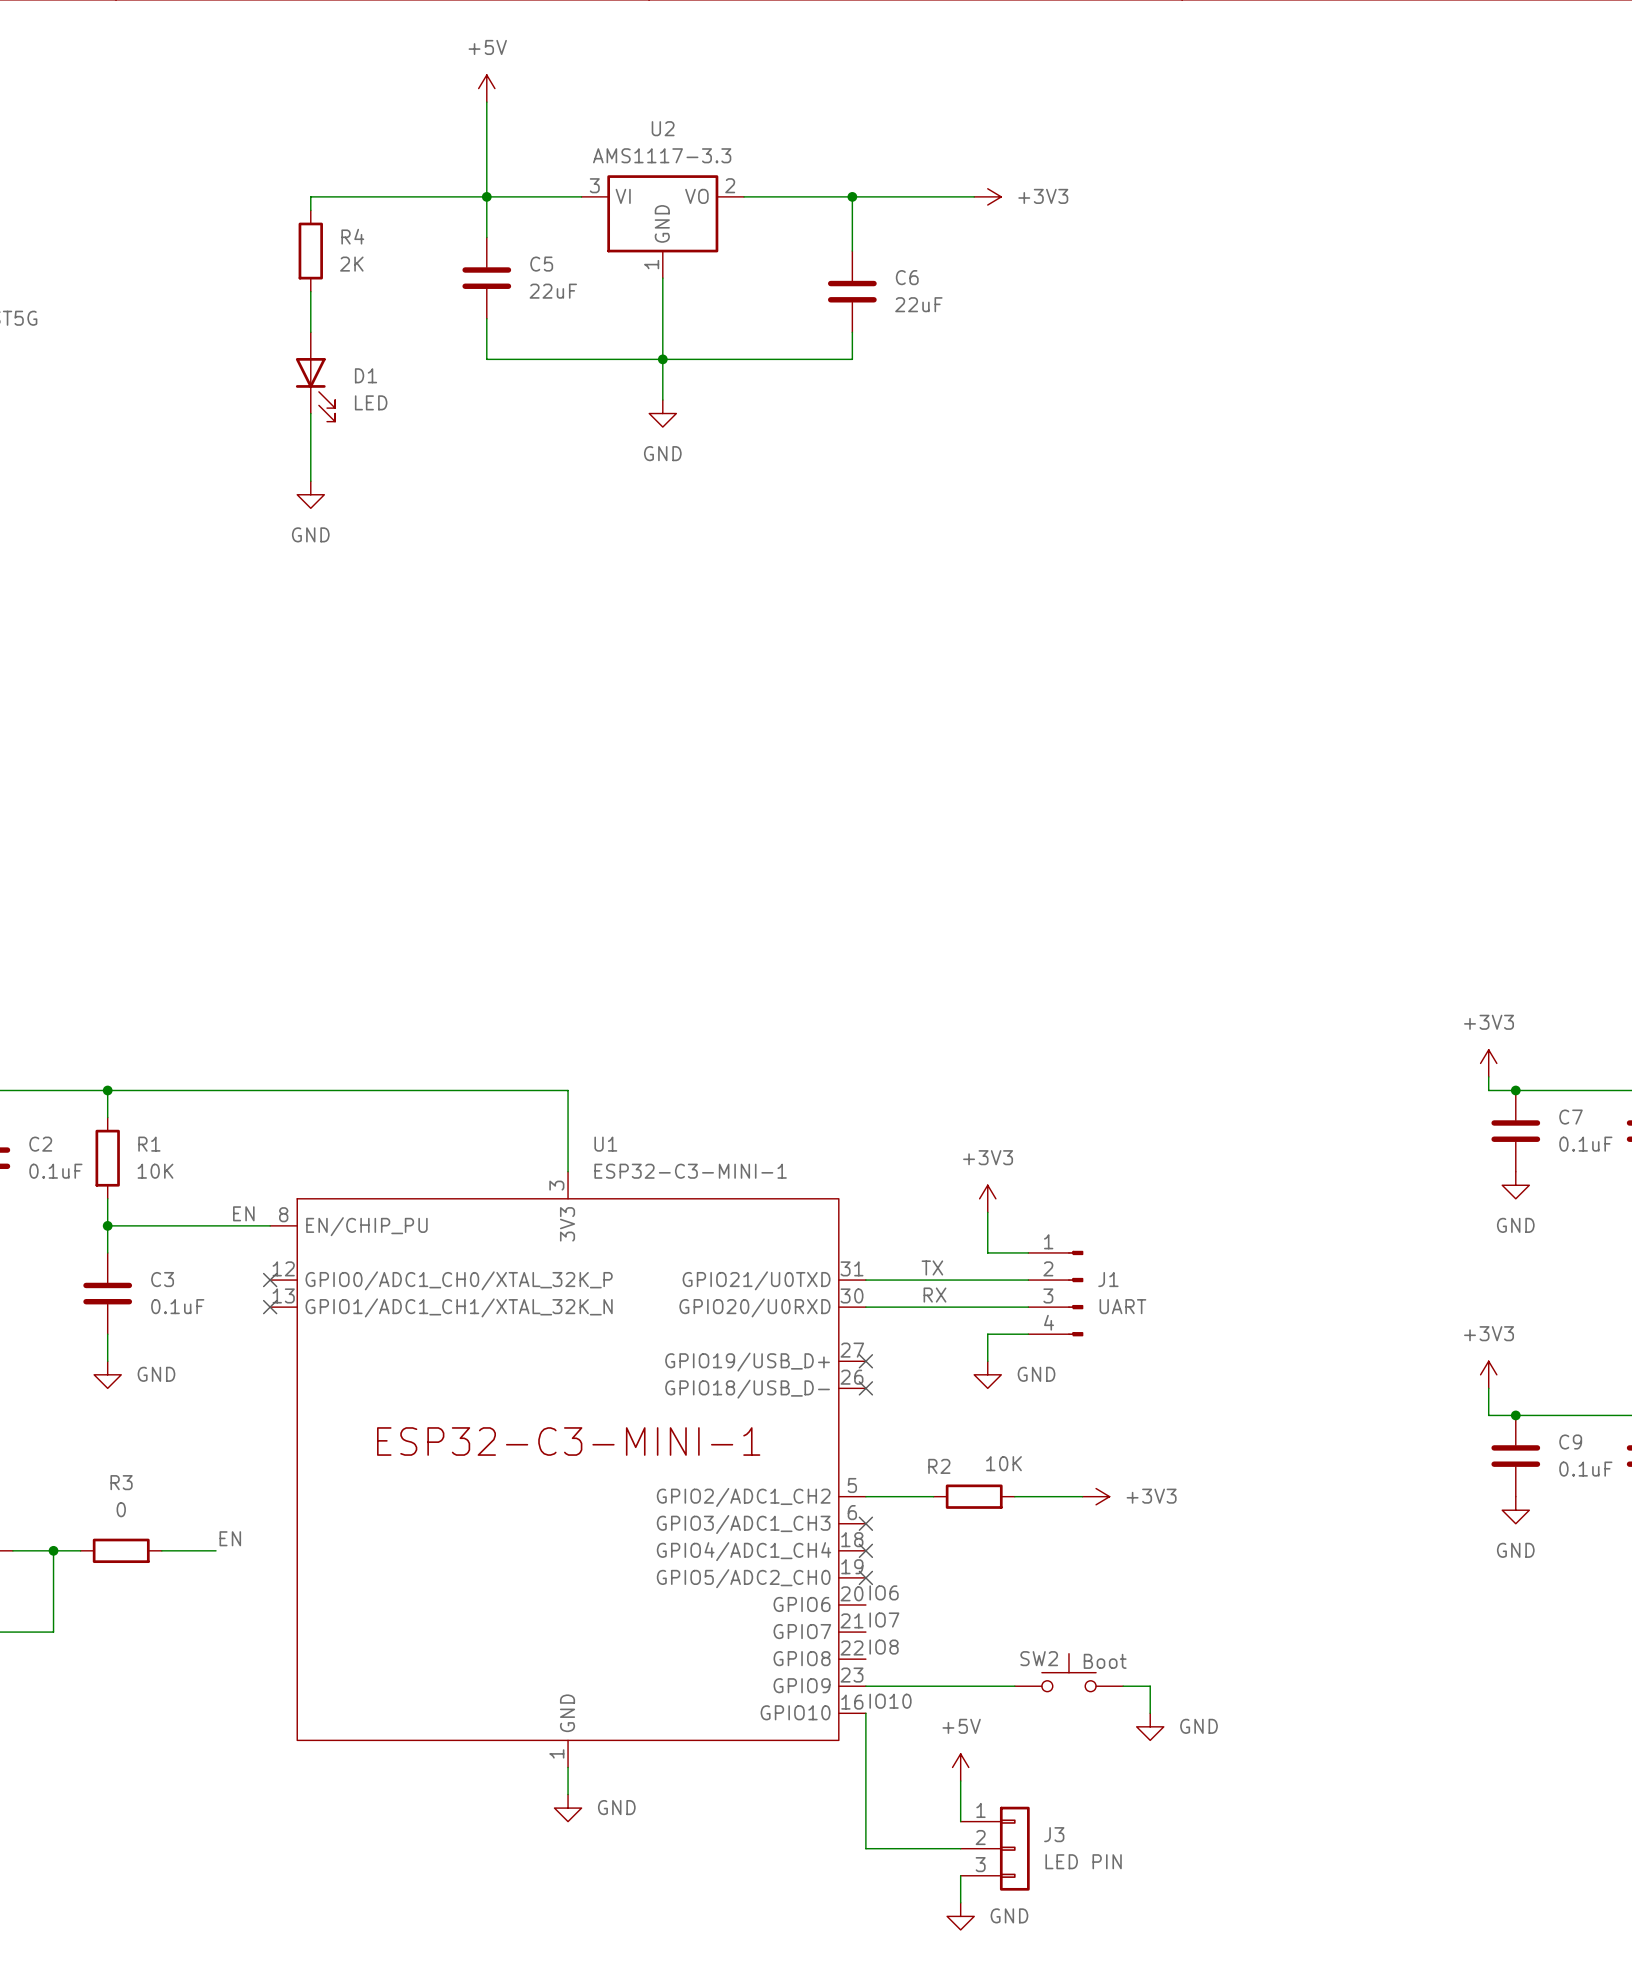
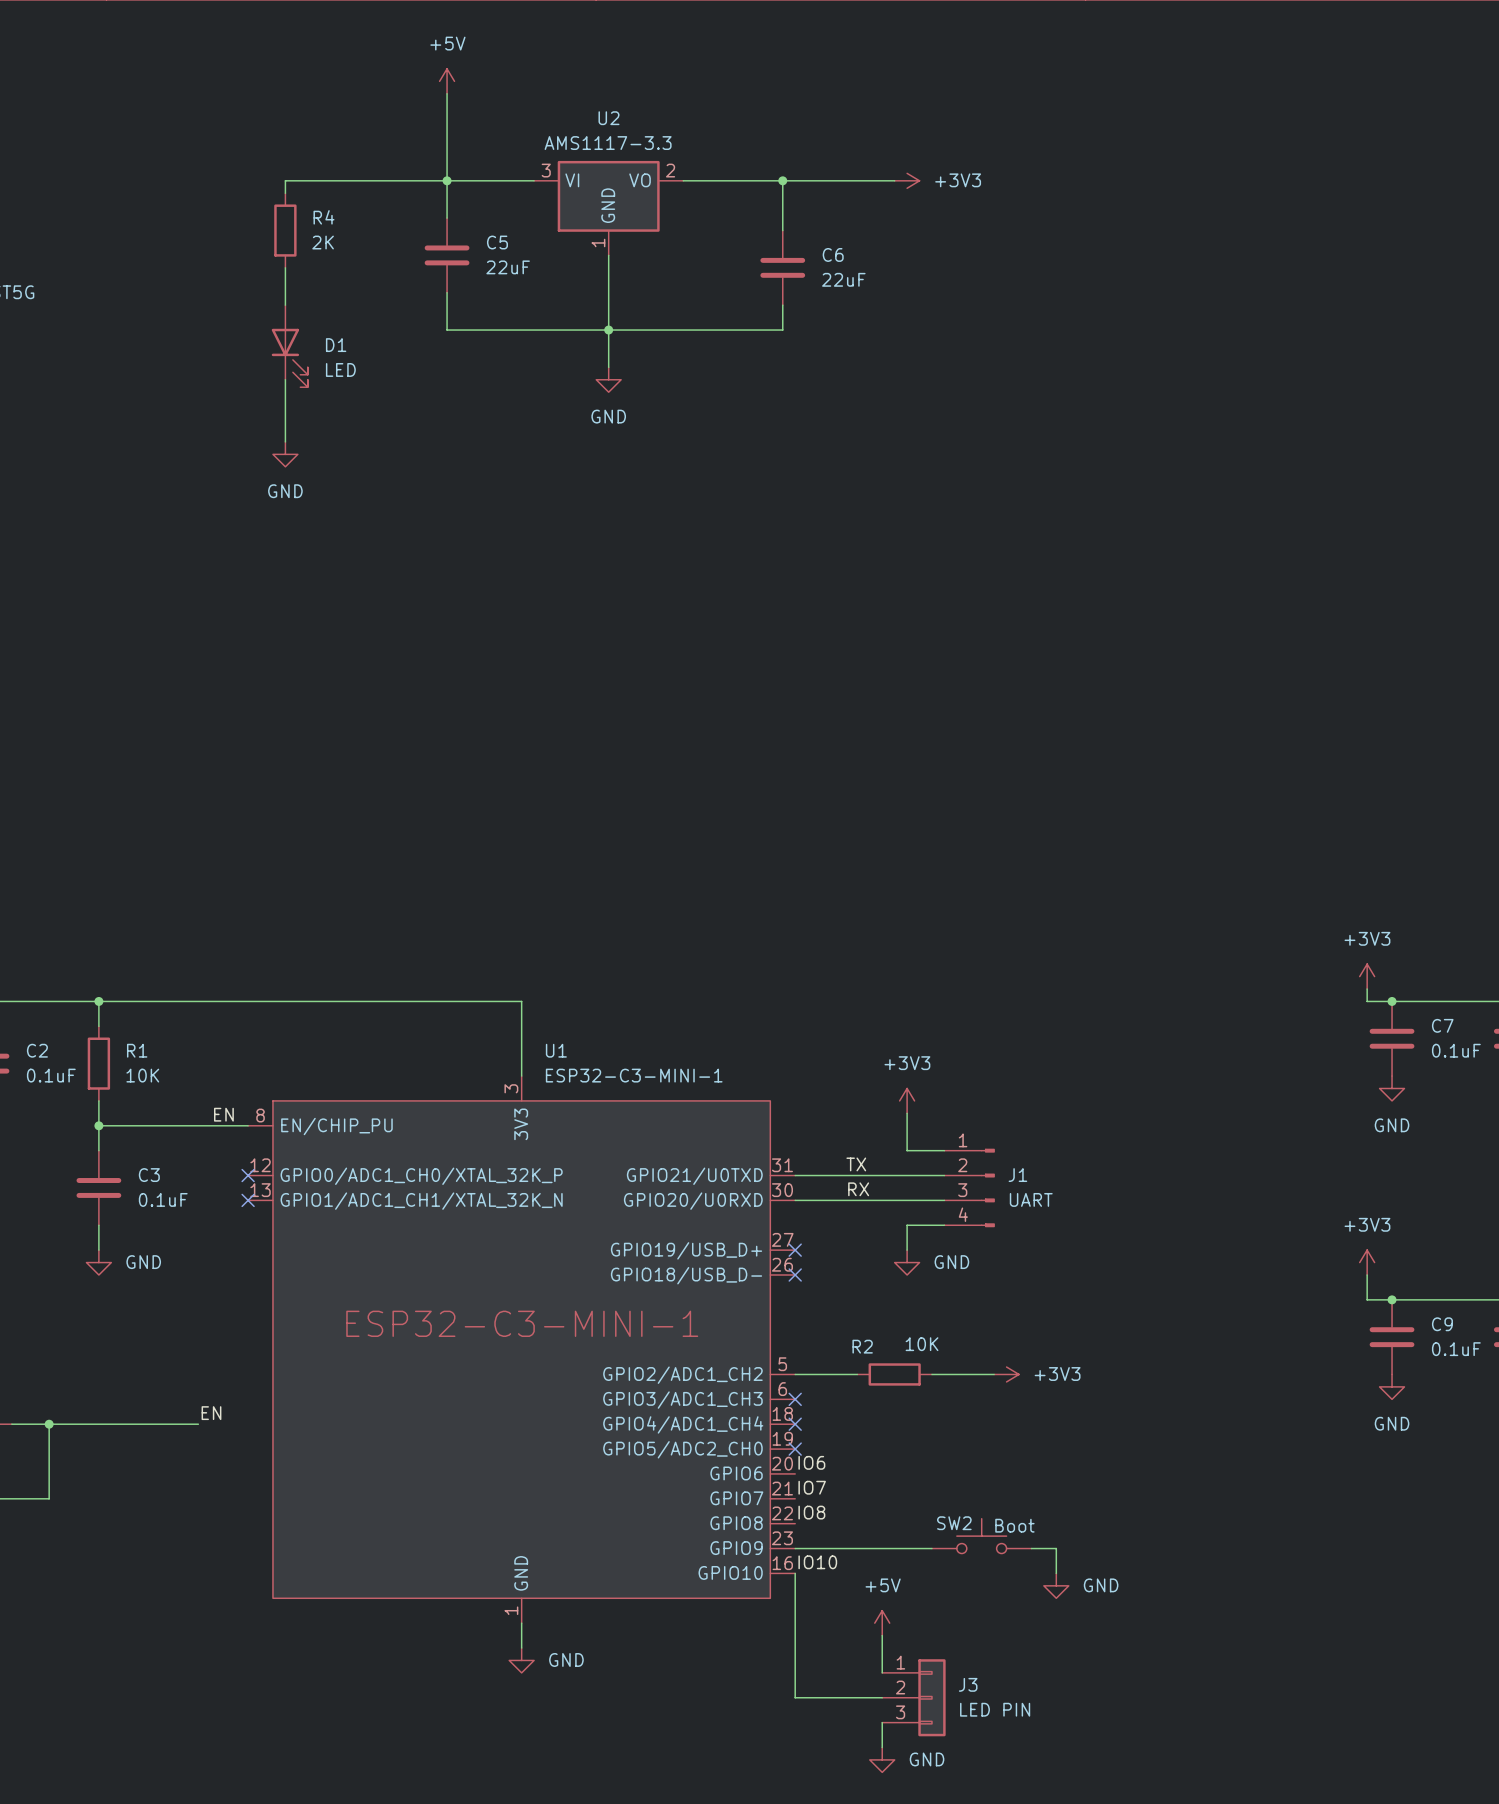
wire: none -> (74, 1424) (148, 1424)
R3: 0 (121, 1550) -> none

